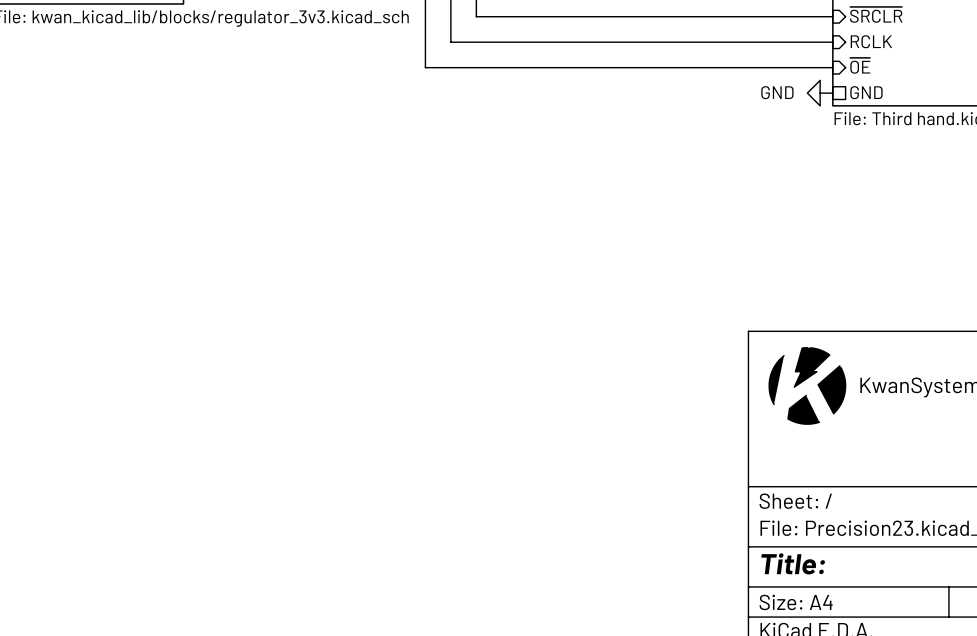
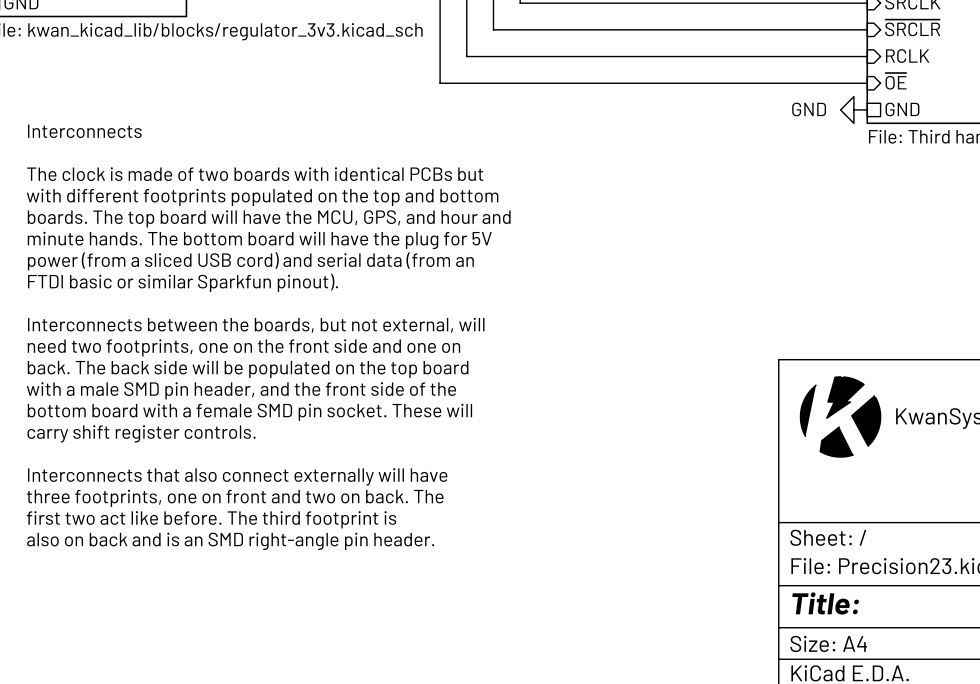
text: none -> Interconnects (84, 131)
text: none -> The clock is made of two boards with identical PCBs but (255, 174)
text: none -> with different footprints populated on the top and bottom (262, 197)
text: none -> boards. The top board will have the MCU, GPS, and hour and (269, 218)
text: none -> minute hands. The bottom board will have the plug for 5V (259, 240)
text: none -> power (from a sliced USB cord) and serial data (from an (250, 261)
text: none -> FTDI basic or similar Sparkfun pinout). (183, 282)
text: none -> Interconnects between the boards, but not external, will (256, 325)
text: none -> need two footprints, one on the front side and one on (243, 347)
text: none -> back. The back side will be populated on the top board (248, 369)
text: none -> with a male SMD pin header, and the front side of the (241, 390)
text: none -> bottom board with a female SMD pin socket. These will (249, 412)
text: none -> carry shift register controls. (141, 433)
text: none -> Interconnects that also connect externally will have (237, 476)
text: none -> three footprints, one on front and two on back. The (235, 498)
text: none -> first two act like before. The third footprint is (211, 519)
text: none -> also on back and is an SMD right-angle pin header. (230, 541)

